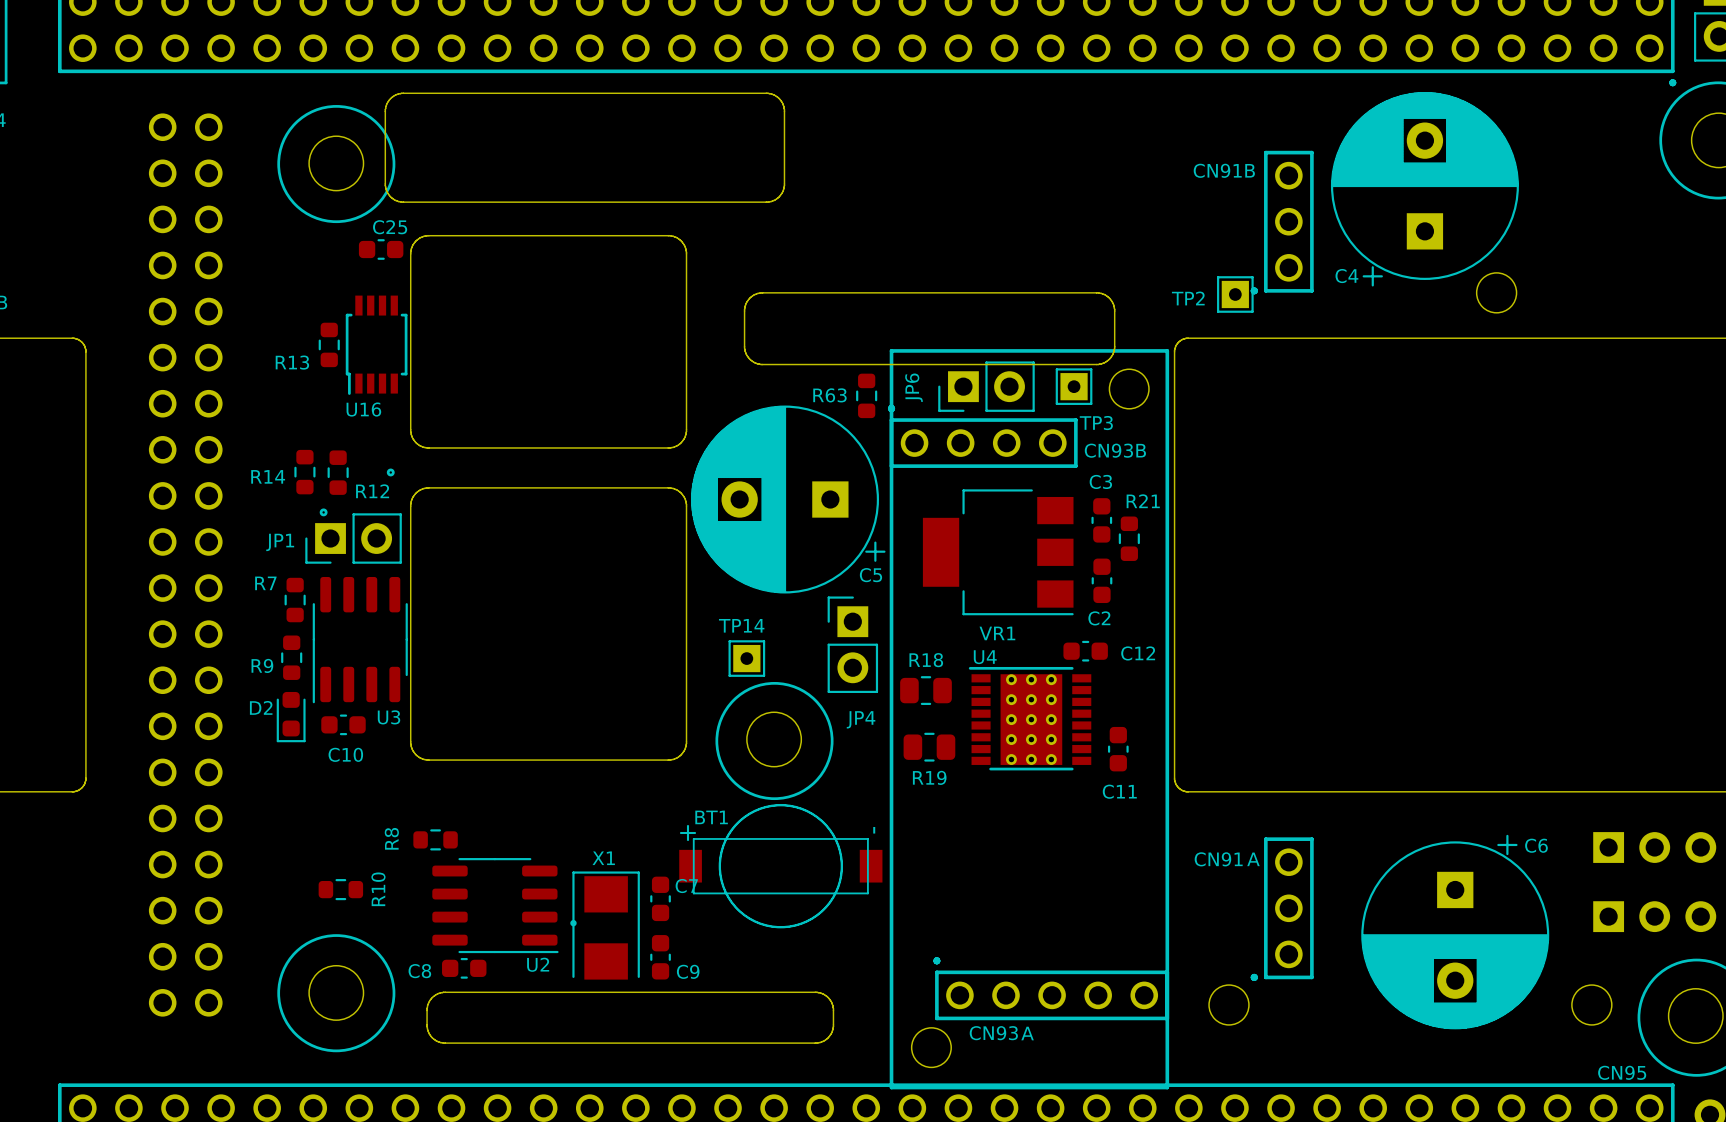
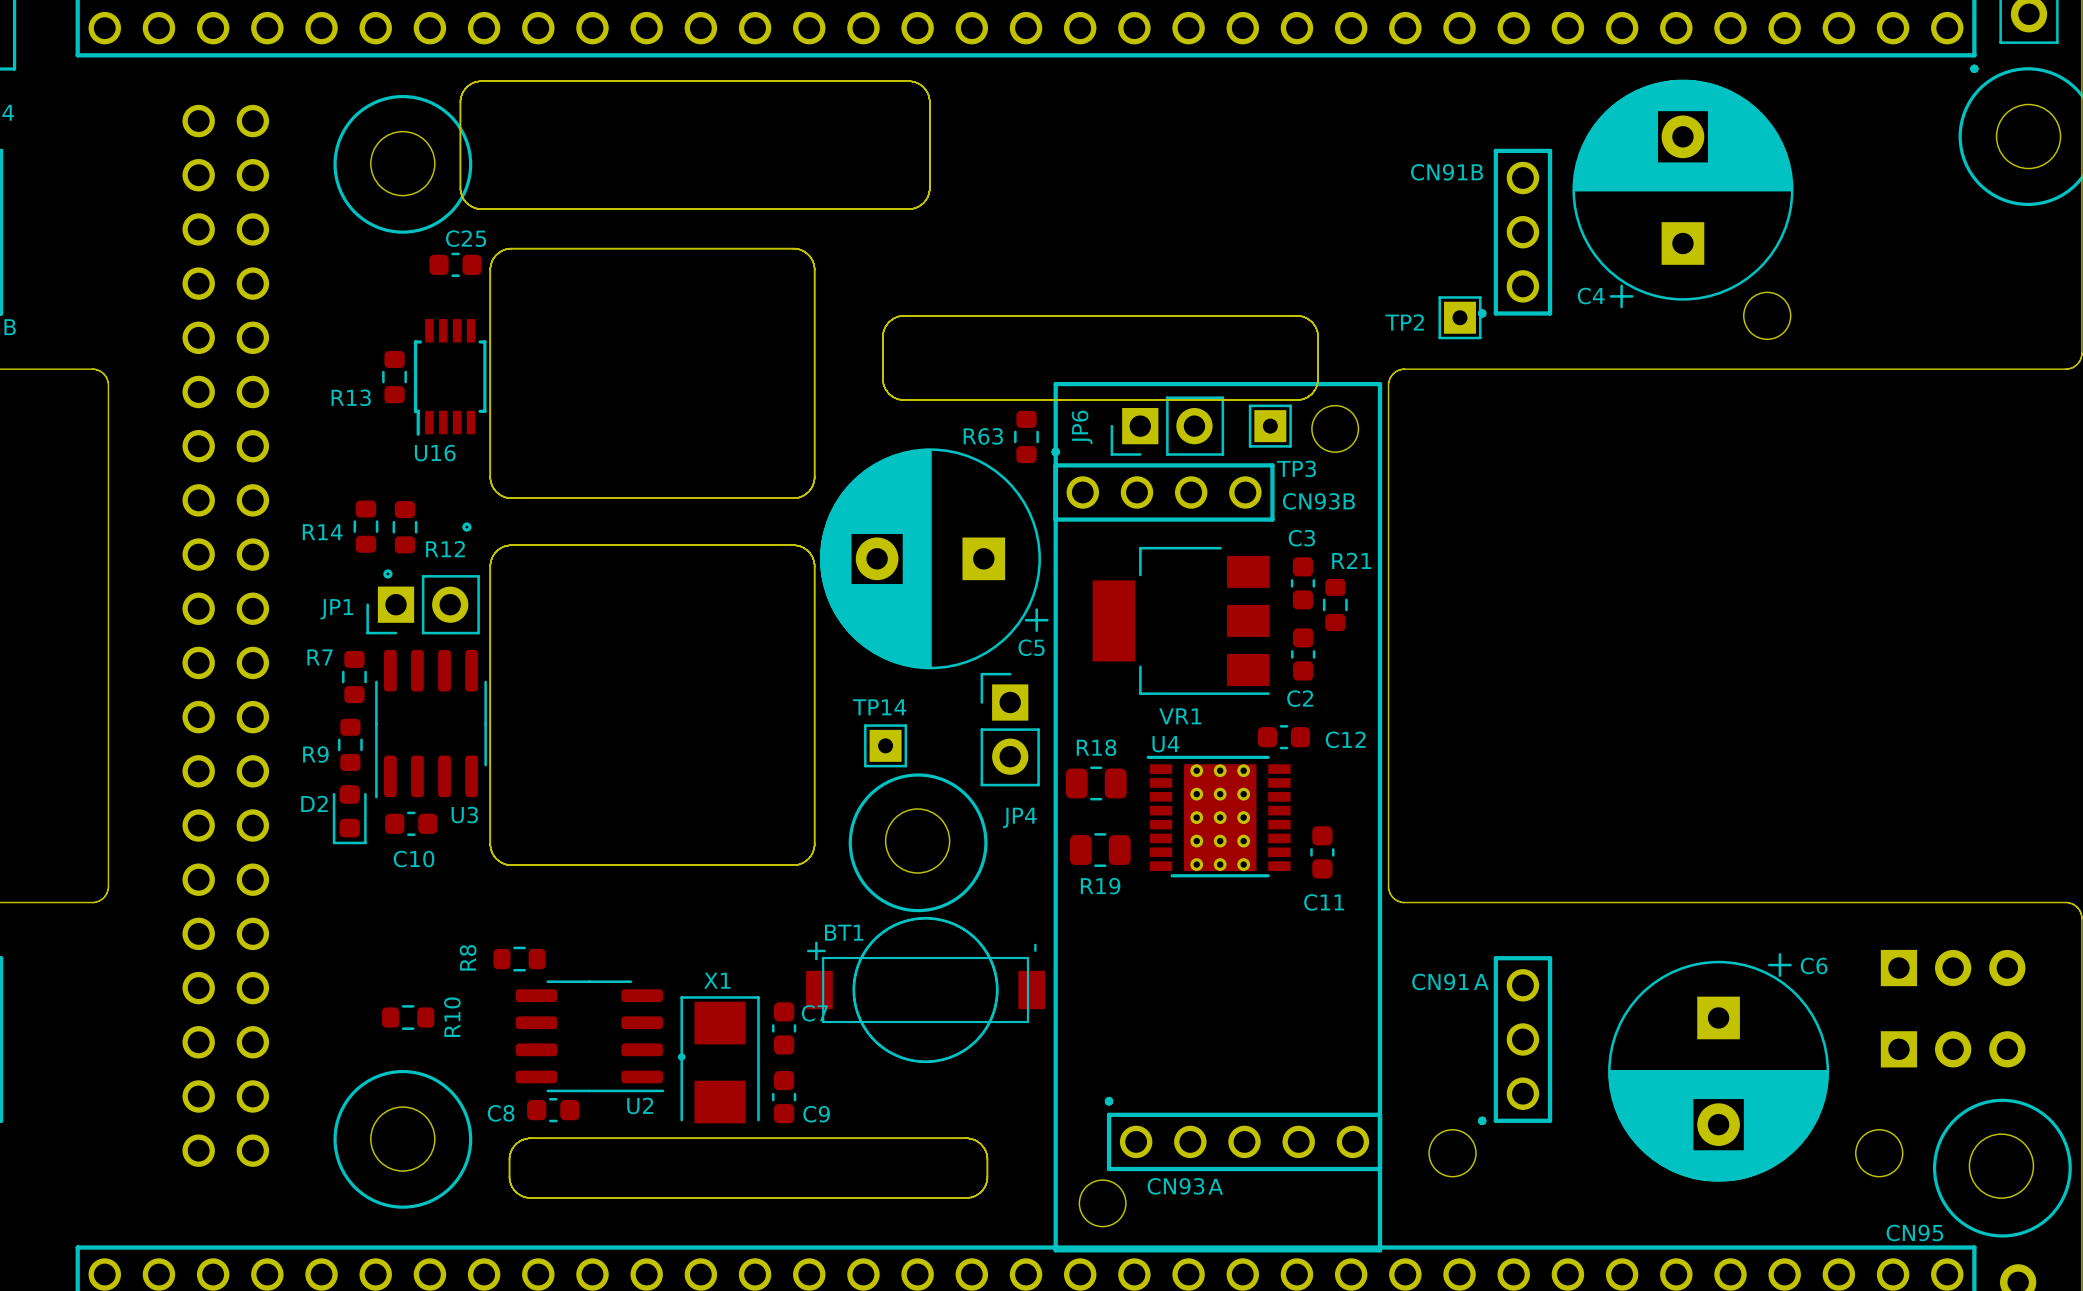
board edge: none -> (479, 81) (914, 81) (924, 88) (929, 100) (929, 193) (922, 204) (910, 209) (476, 208) (465, 201) (460, 189) (460, 100) (466, 87) (479, 81)
board edge: none -> (509, 248) (795, 248) (806, 253) (811, 259) (814, 268) (814, 478) (809, 490) (803, 495) (795, 498) (509, 498) (498, 493) (493, 487) (490, 478) (490, 268) (496, 254) (509, 248)
board edge: none -> (902, 315) (1298, 315) (1310, 320) (1317, 331) (1318, 380) (1311, 393) (1298, 400) (902, 400) (889, 393) (882, 380) (883, 331) (890, 320) (902, 315)
board edge: none -> (509, 545) (795, 545) (808, 551) (814, 564) (814, 845) (808, 859) (795, 865) (509, 865) (496, 859) (490, 845) (490, 564) (496, 551) (509, 545)
board edge: none -> (528, 1138) (968, 1138) (976, 1141) (985, 1150) (987, 1178) (981, 1191) (968, 1198) (528, 1198) (515, 1191) (509, 1178) (511, 1150) (520, 1141) (528, 1138)

